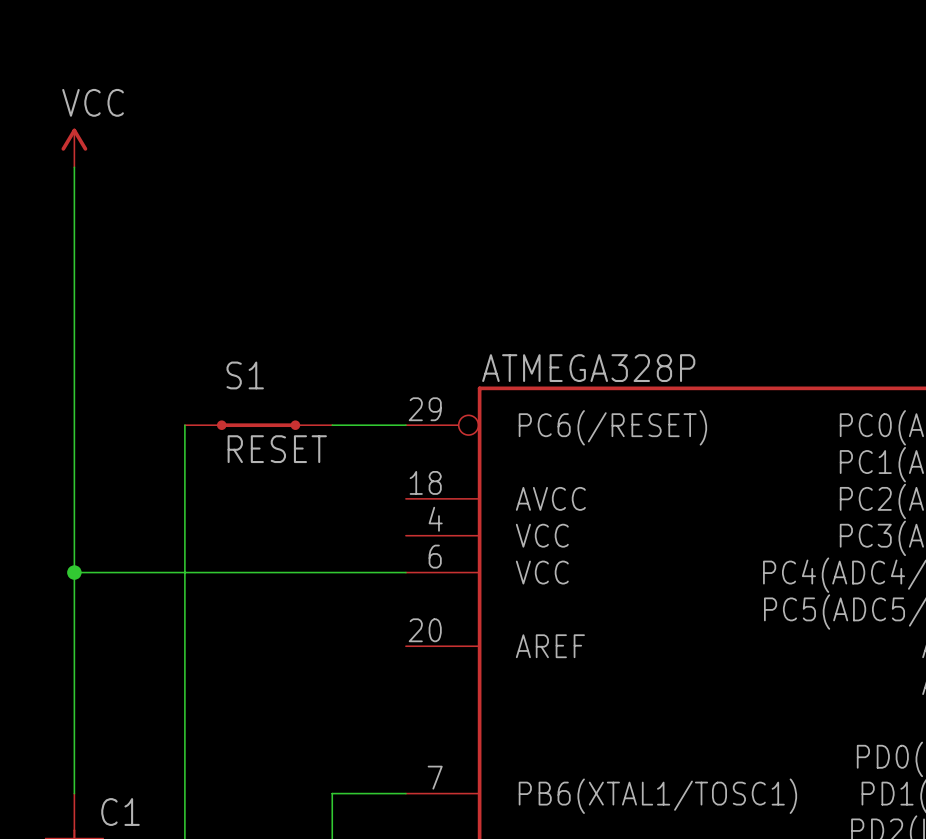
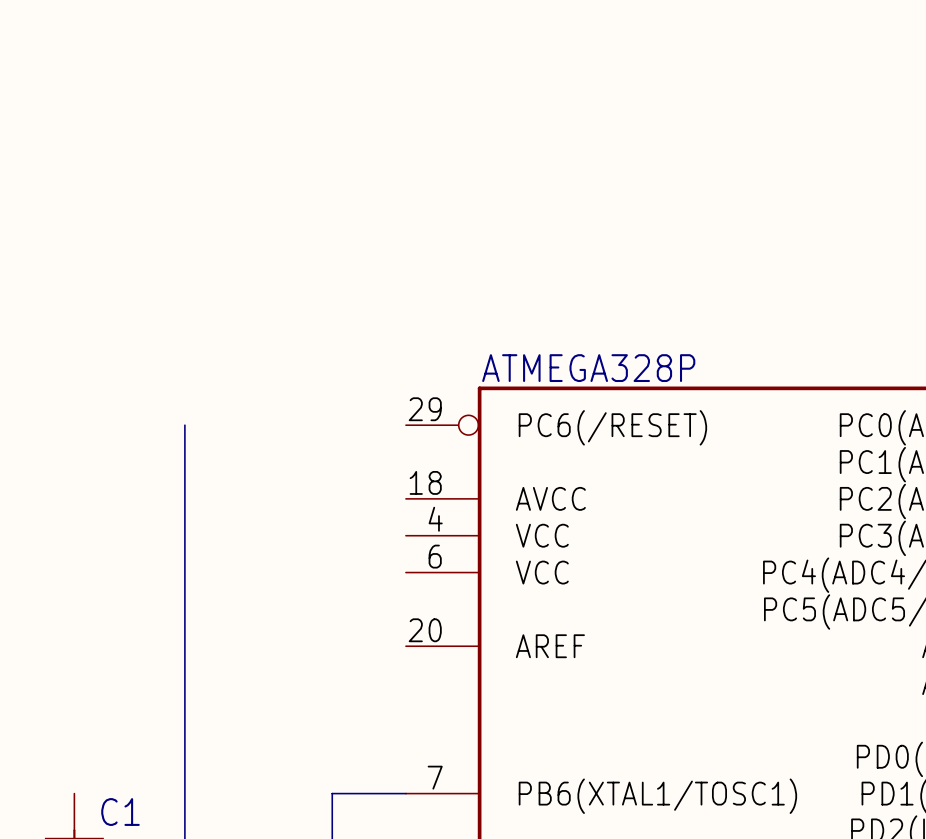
power symbol: VCC (74, 147) -> none
wire: (74, 167) (74, 793) -> none
S1: RESET (258, 425) -> none
wire: (332, 425) (405, 425) -> none
wire: (74, 572) (405, 572) -> none
junction: (74, 572) -> none

